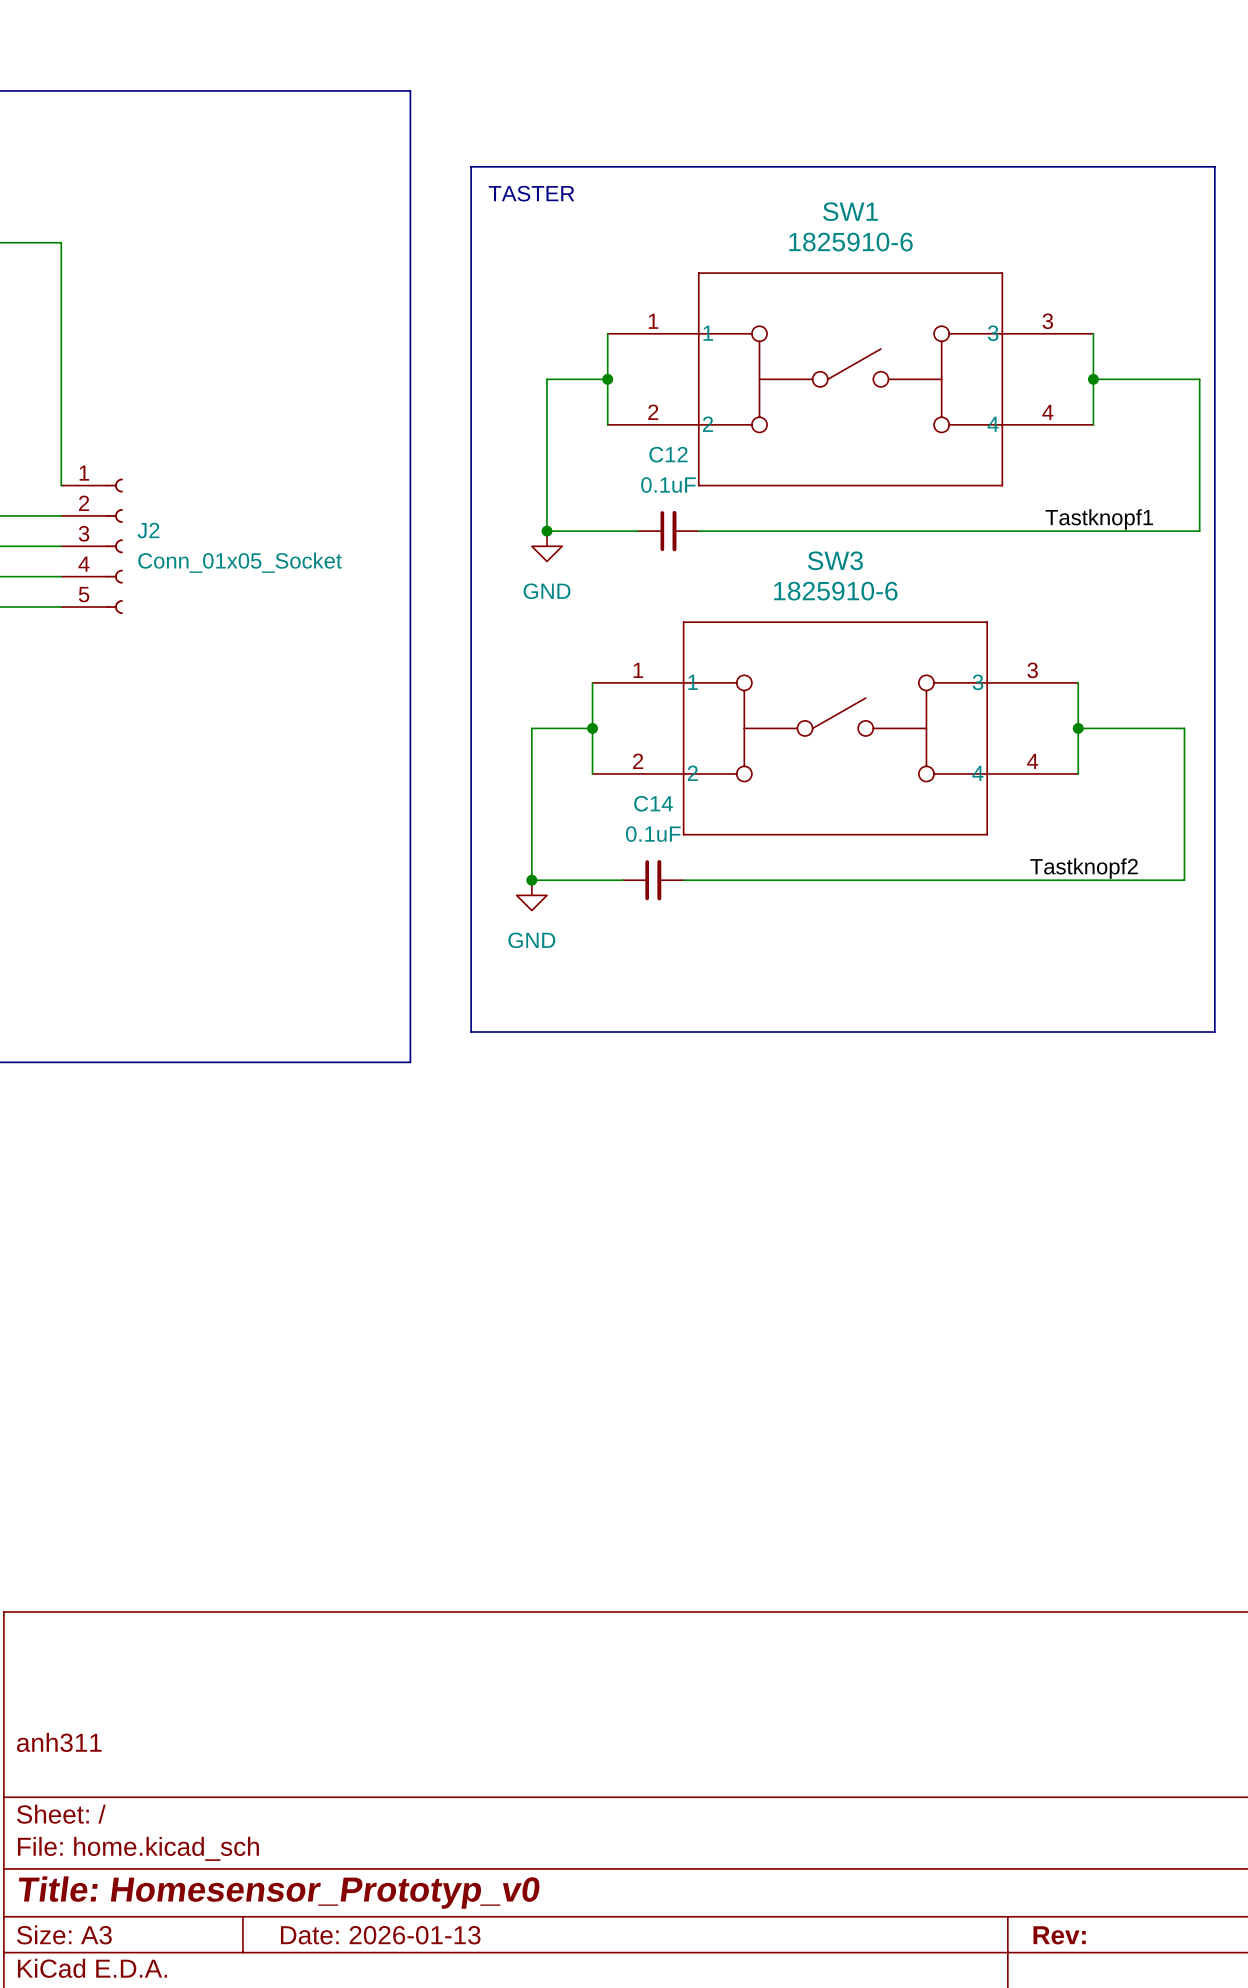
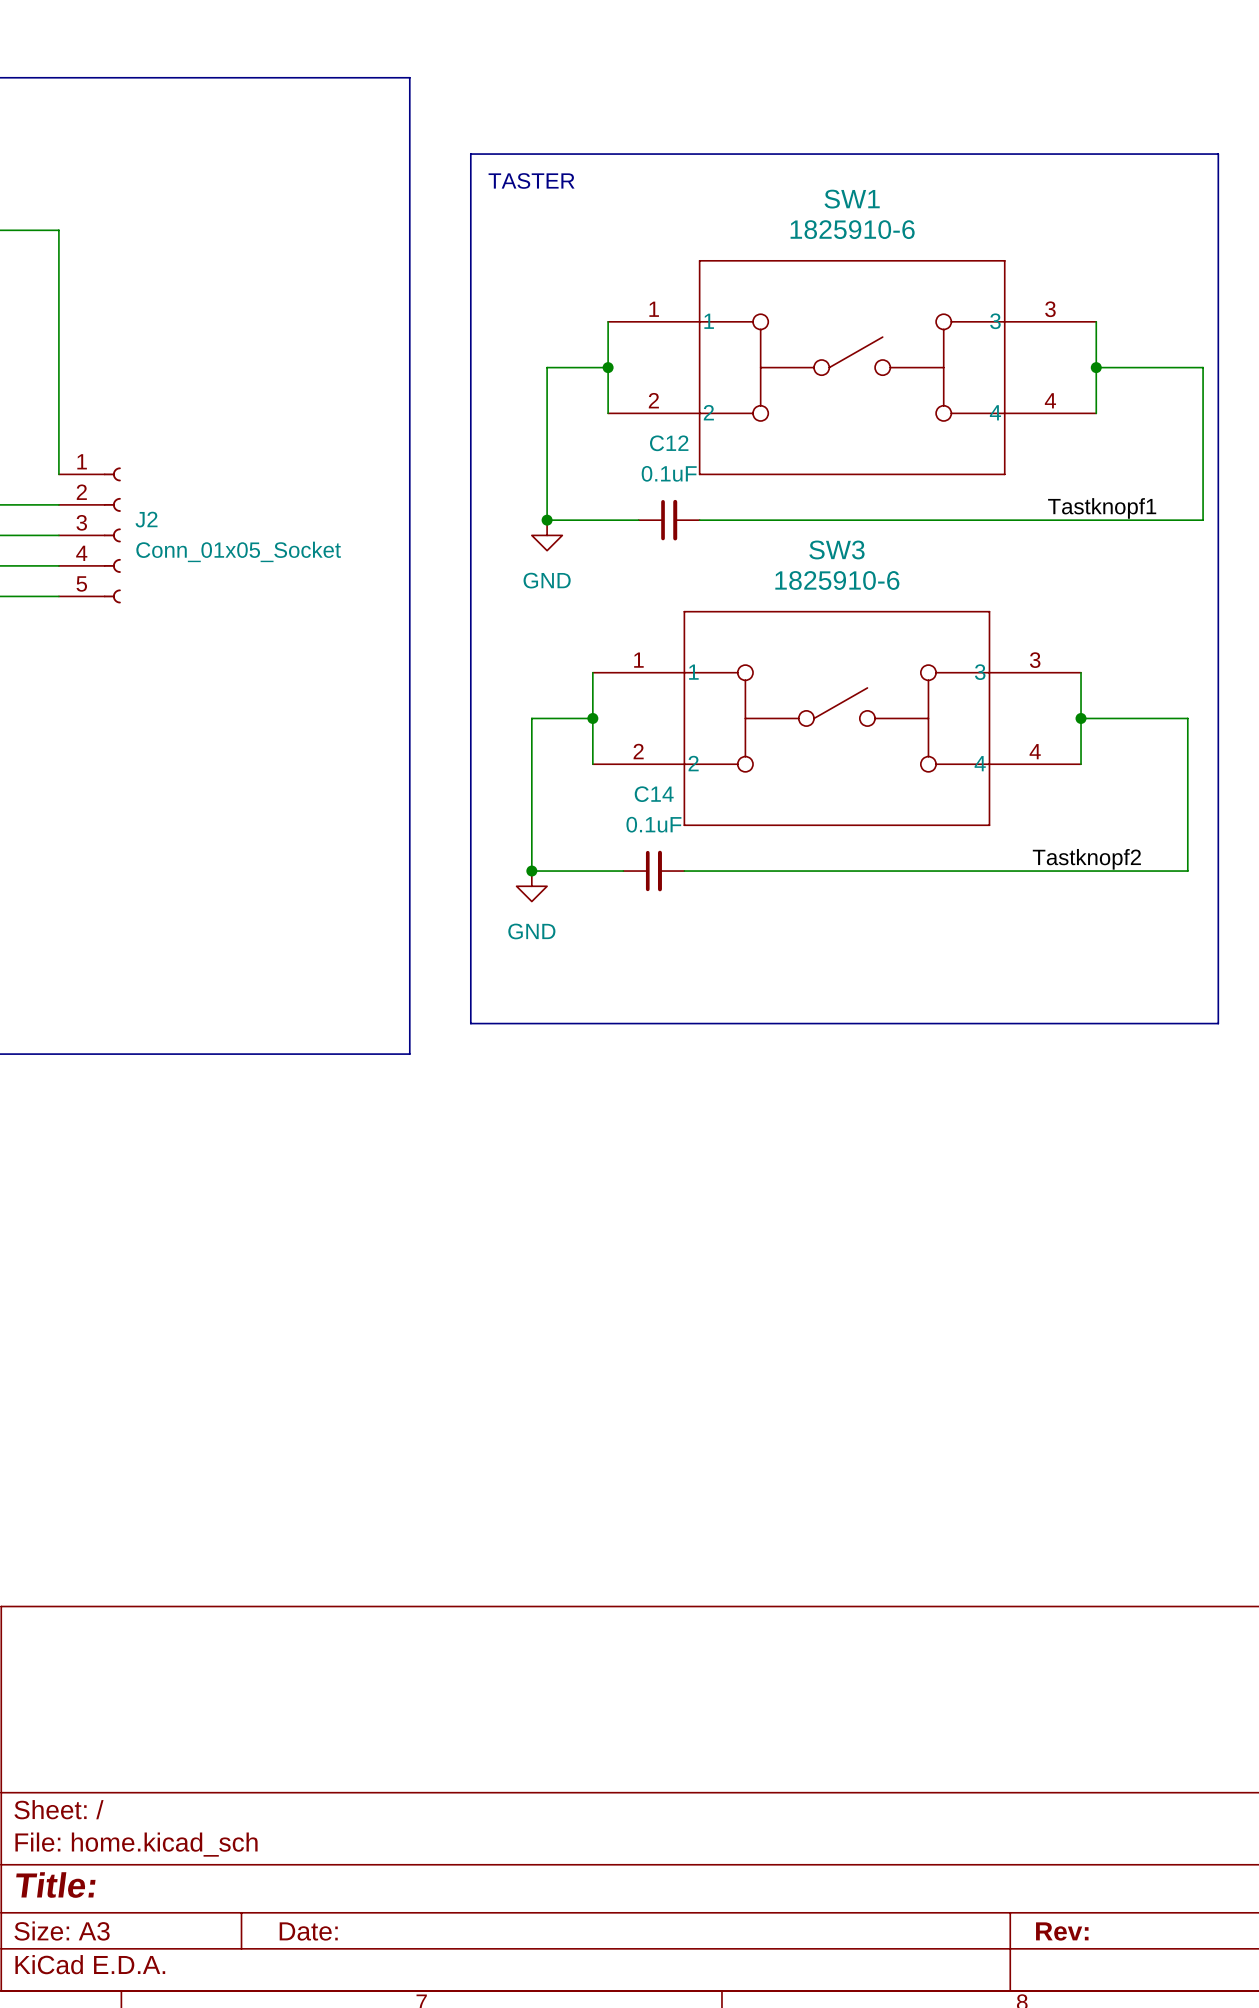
title block: anh311 (59, 1742) -> none
title block: Title: Homesensor_Prototyp_v0 (279, 1892) -> Title: (55, 1885)
title block: Date: 2026-01-13 (380, 1935) -> Date: (308, 1931)

